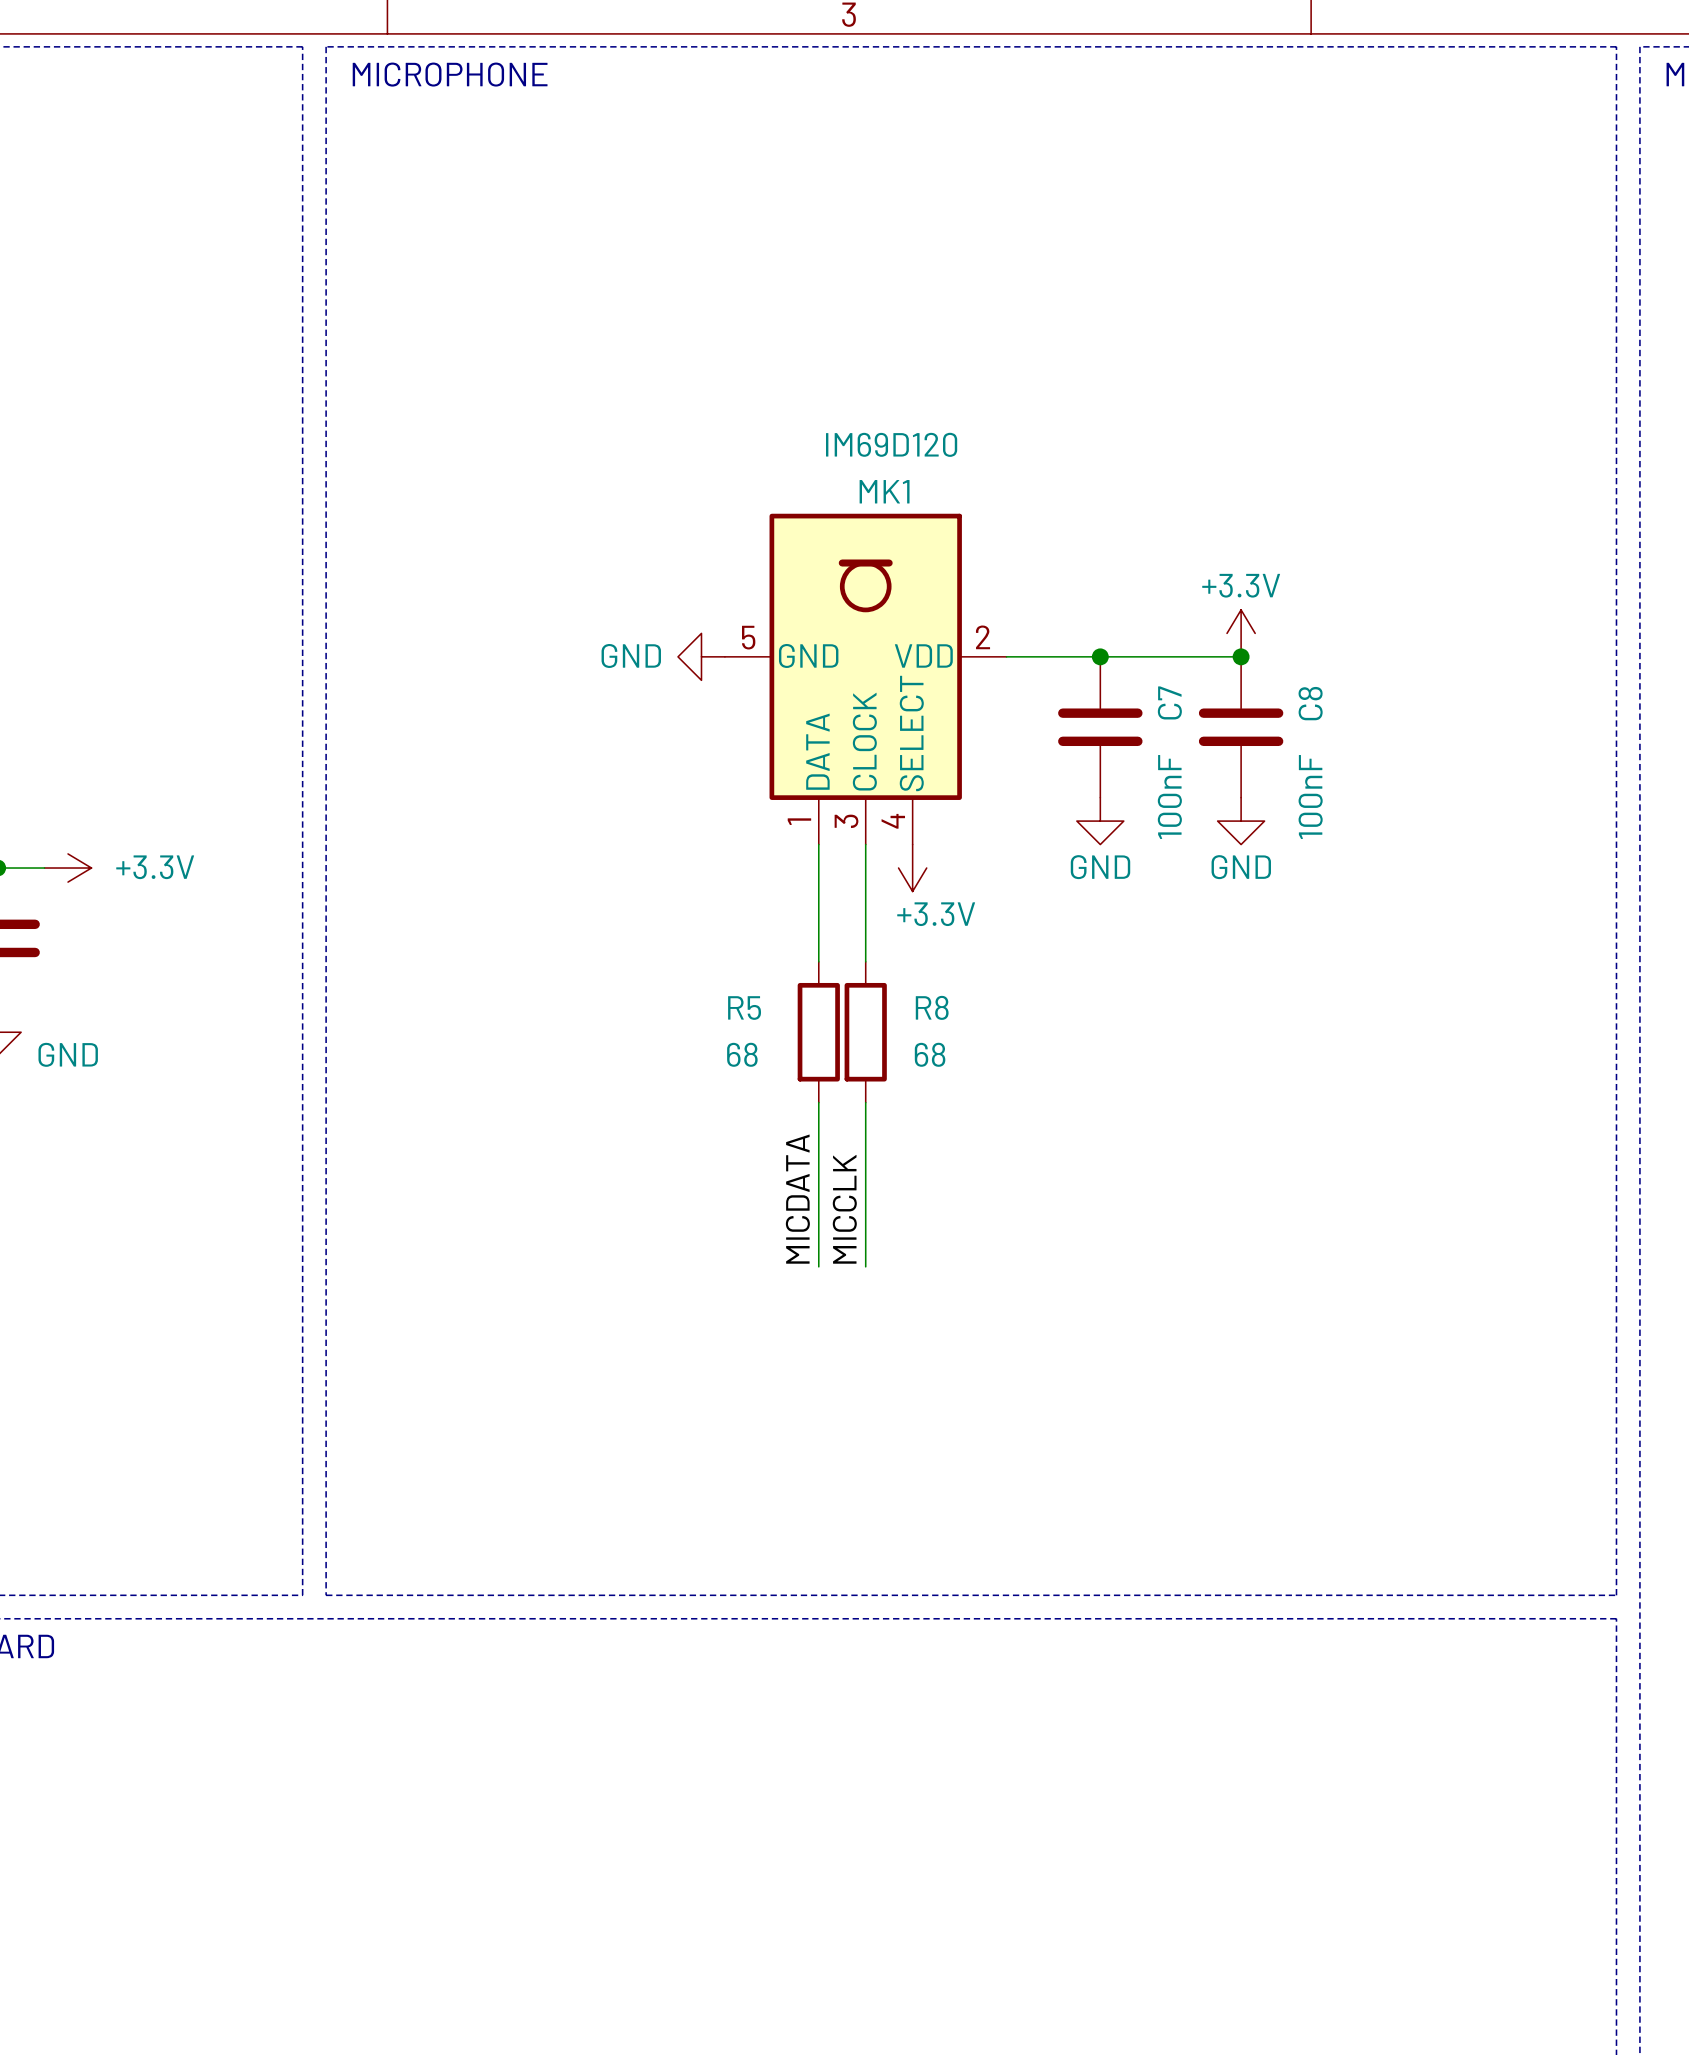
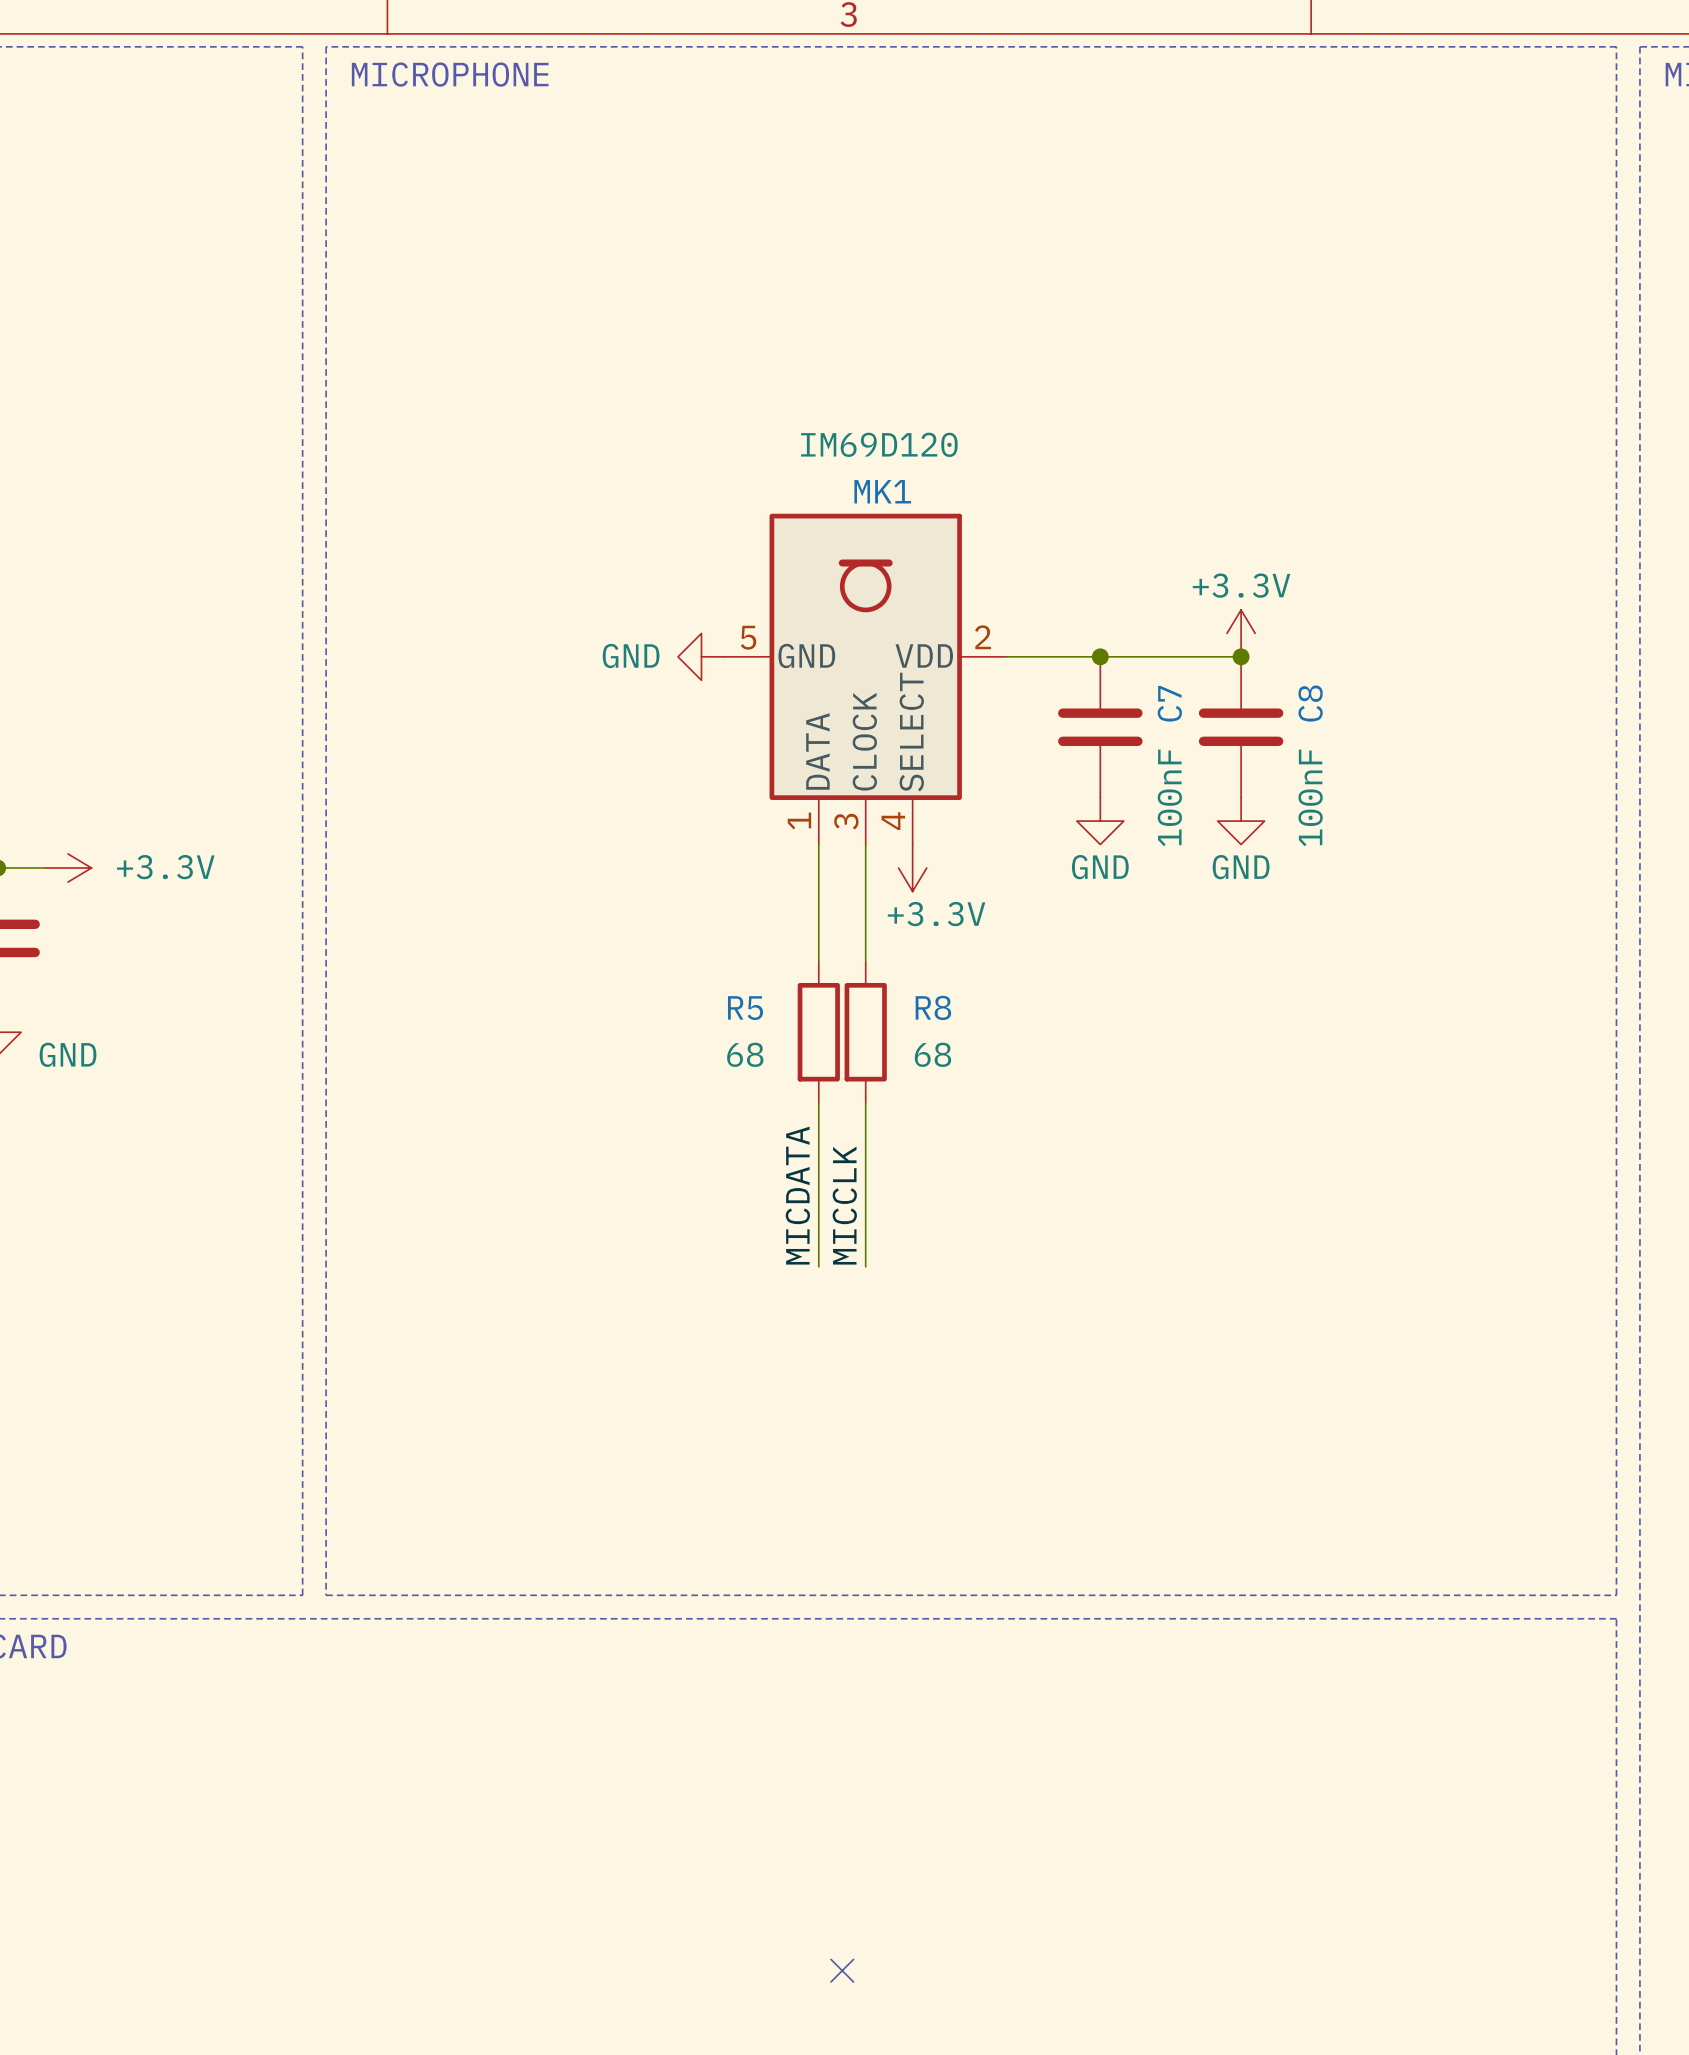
no-connect mark: none -> (842, 1970)

